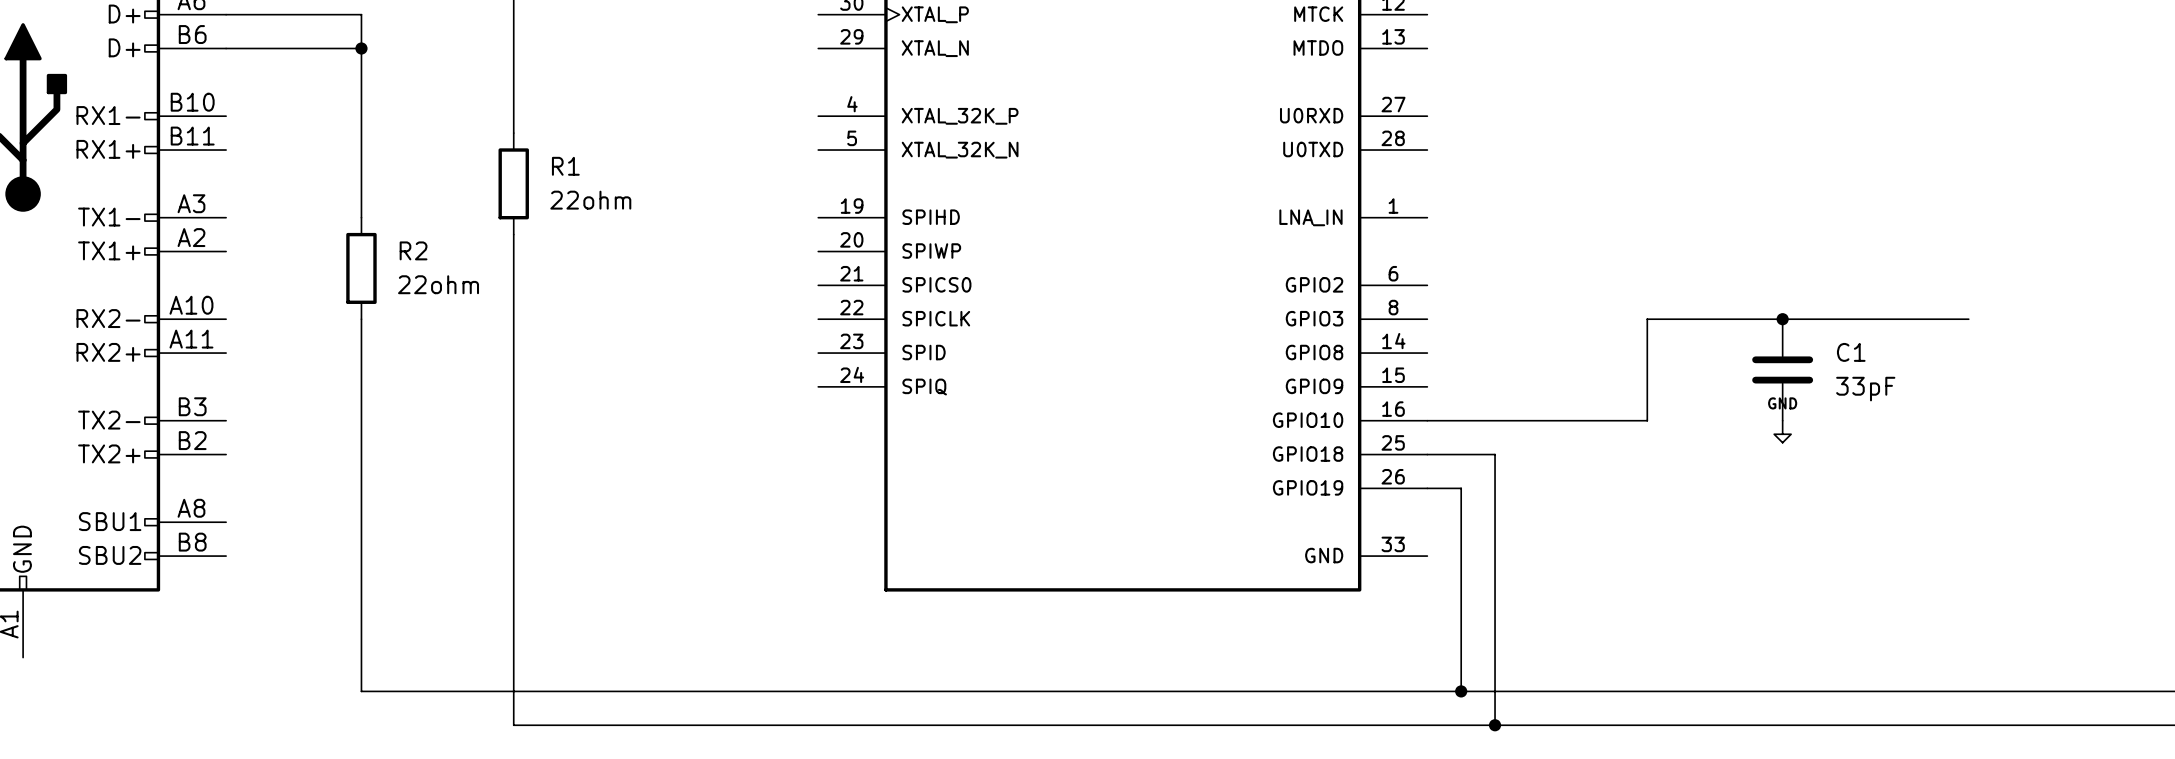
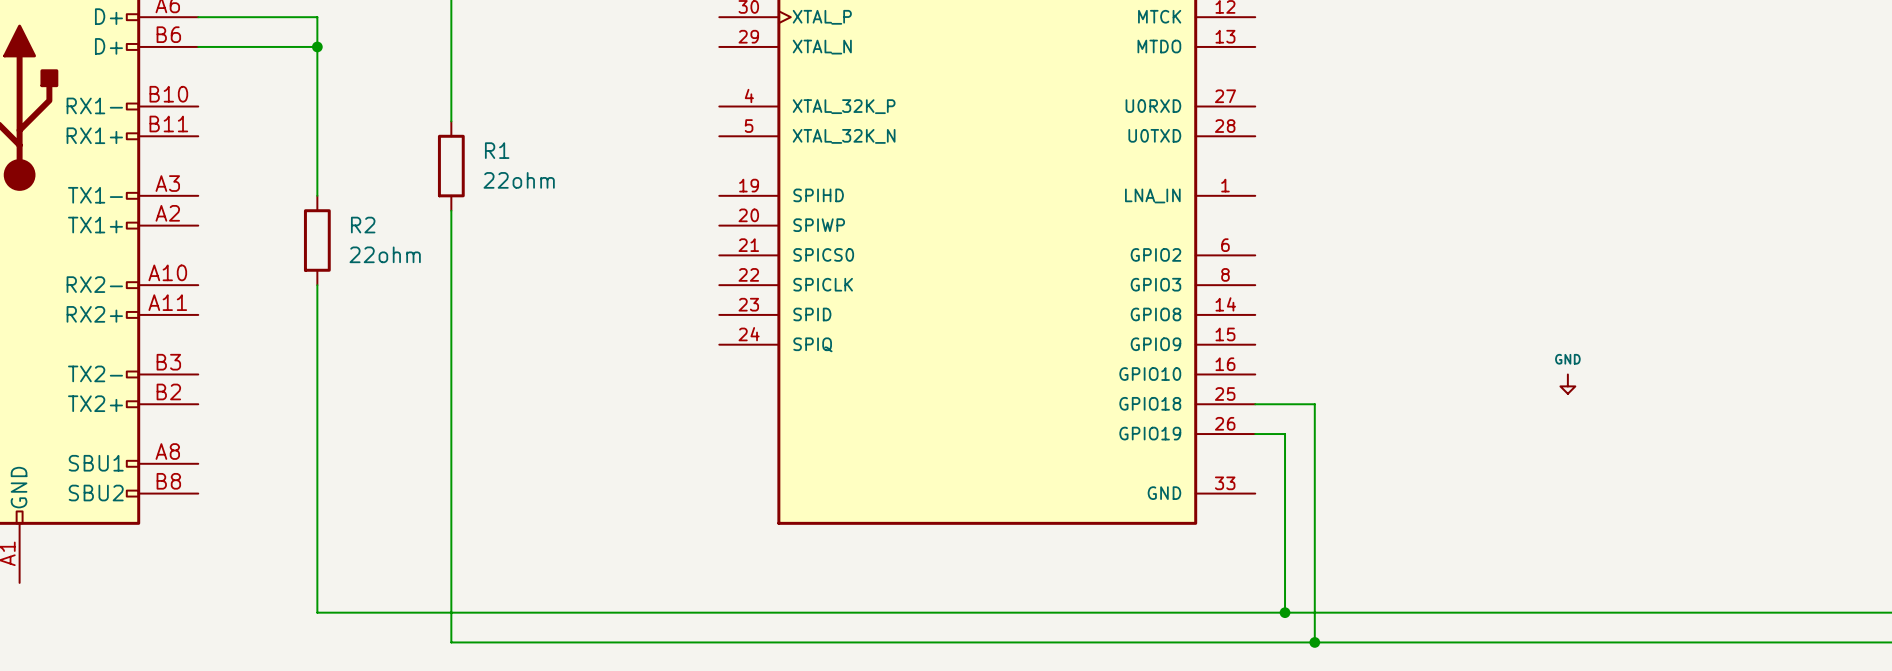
junction: (1782, 319) -> none
wire: (1968, 319) (1647, 319) (1647, 420) (1427, 420) -> none
C1: 33pF (1782, 369) -> none

